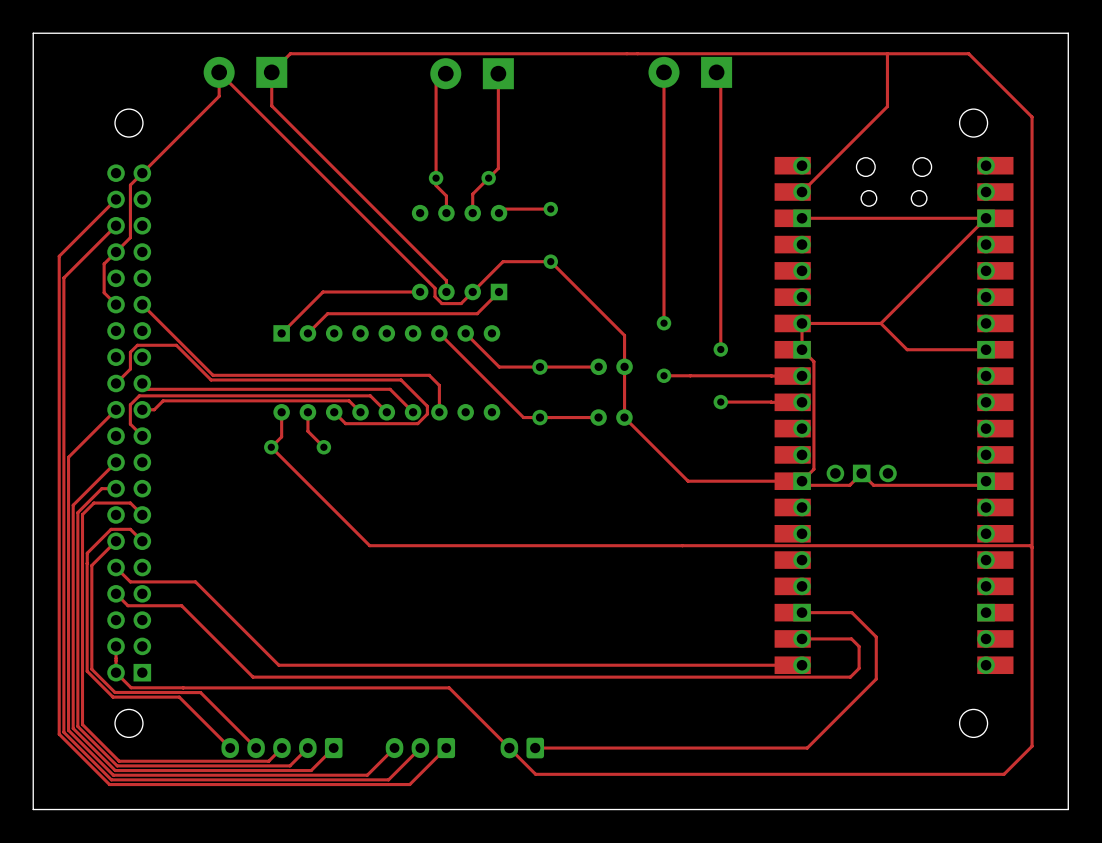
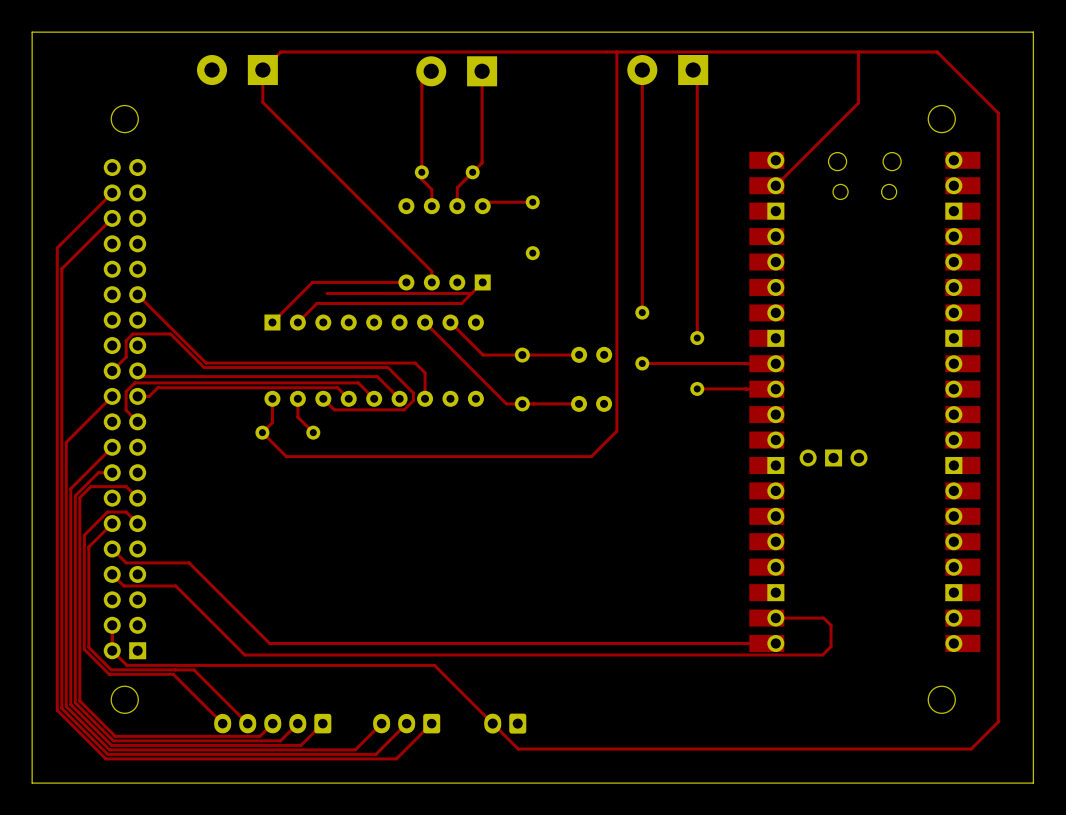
top track: (802, 218) (986, 218) (880, 323) -> none
top track: none -> (471, 293) (326, 293)
top track: (116, 304) (104, 292) (104, 263) (130, 237) (130, 185) (219, 96) (219, 72) (435, 288) (435, 296) (441, 303) (461, 303) (503, 261) (550, 261) (624, 335) (624, 417) -> none
top track: (880, 323) (907, 349) (986, 349) -> none
top track: (880, 323) (802, 323) (802, 349) (813, 361) (813, 469) (802, 481) -> none
top track: (624, 417) (688, 481) (802, 481) -> none
top track: (296, 471) (369, 545) (1030, 545) (1032, 547) -> (286, 456) (591, 456) (616, 431) (616, 51)
top track: (986, 481) (981, 485) (873, 485) (861, 473) (849, 485) (806, 485) (802, 481) -> none
top track: (802, 612) (851, 612) (876, 637) (876, 679) (807, 748) (535, 748) -> none

